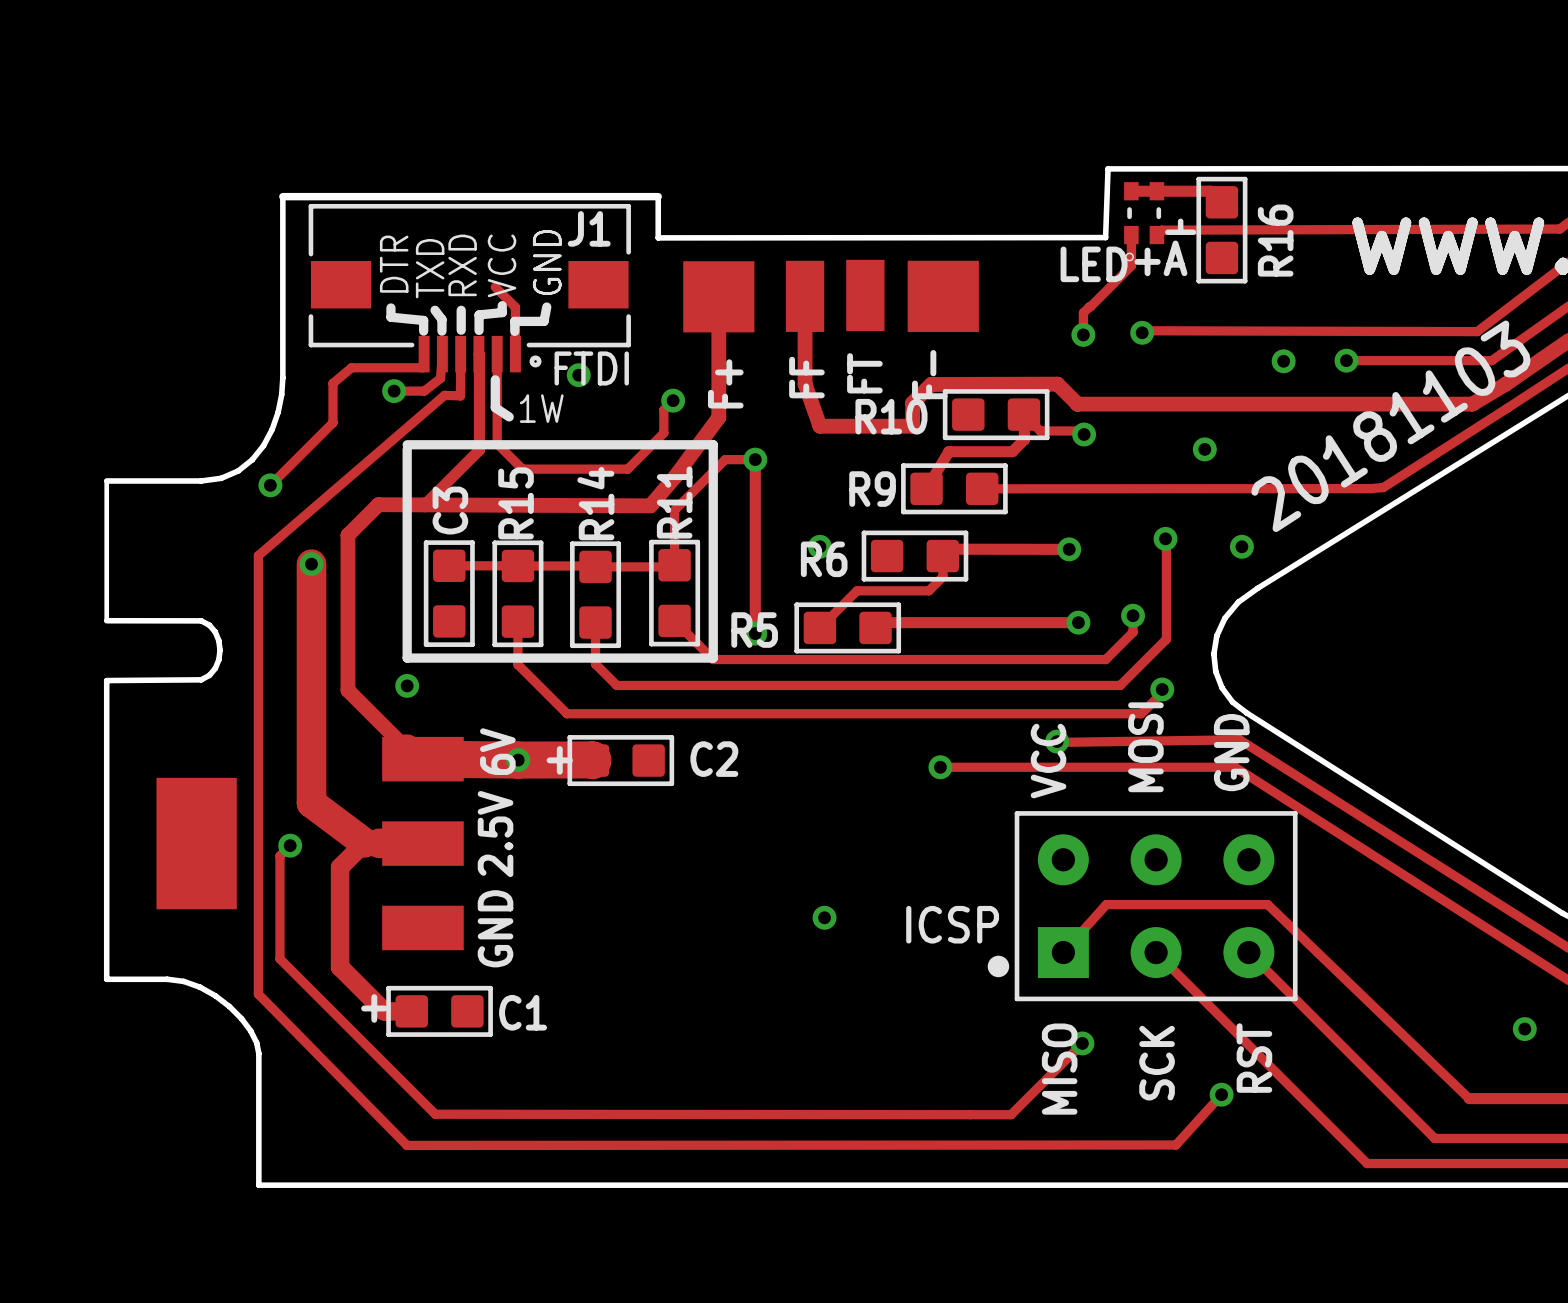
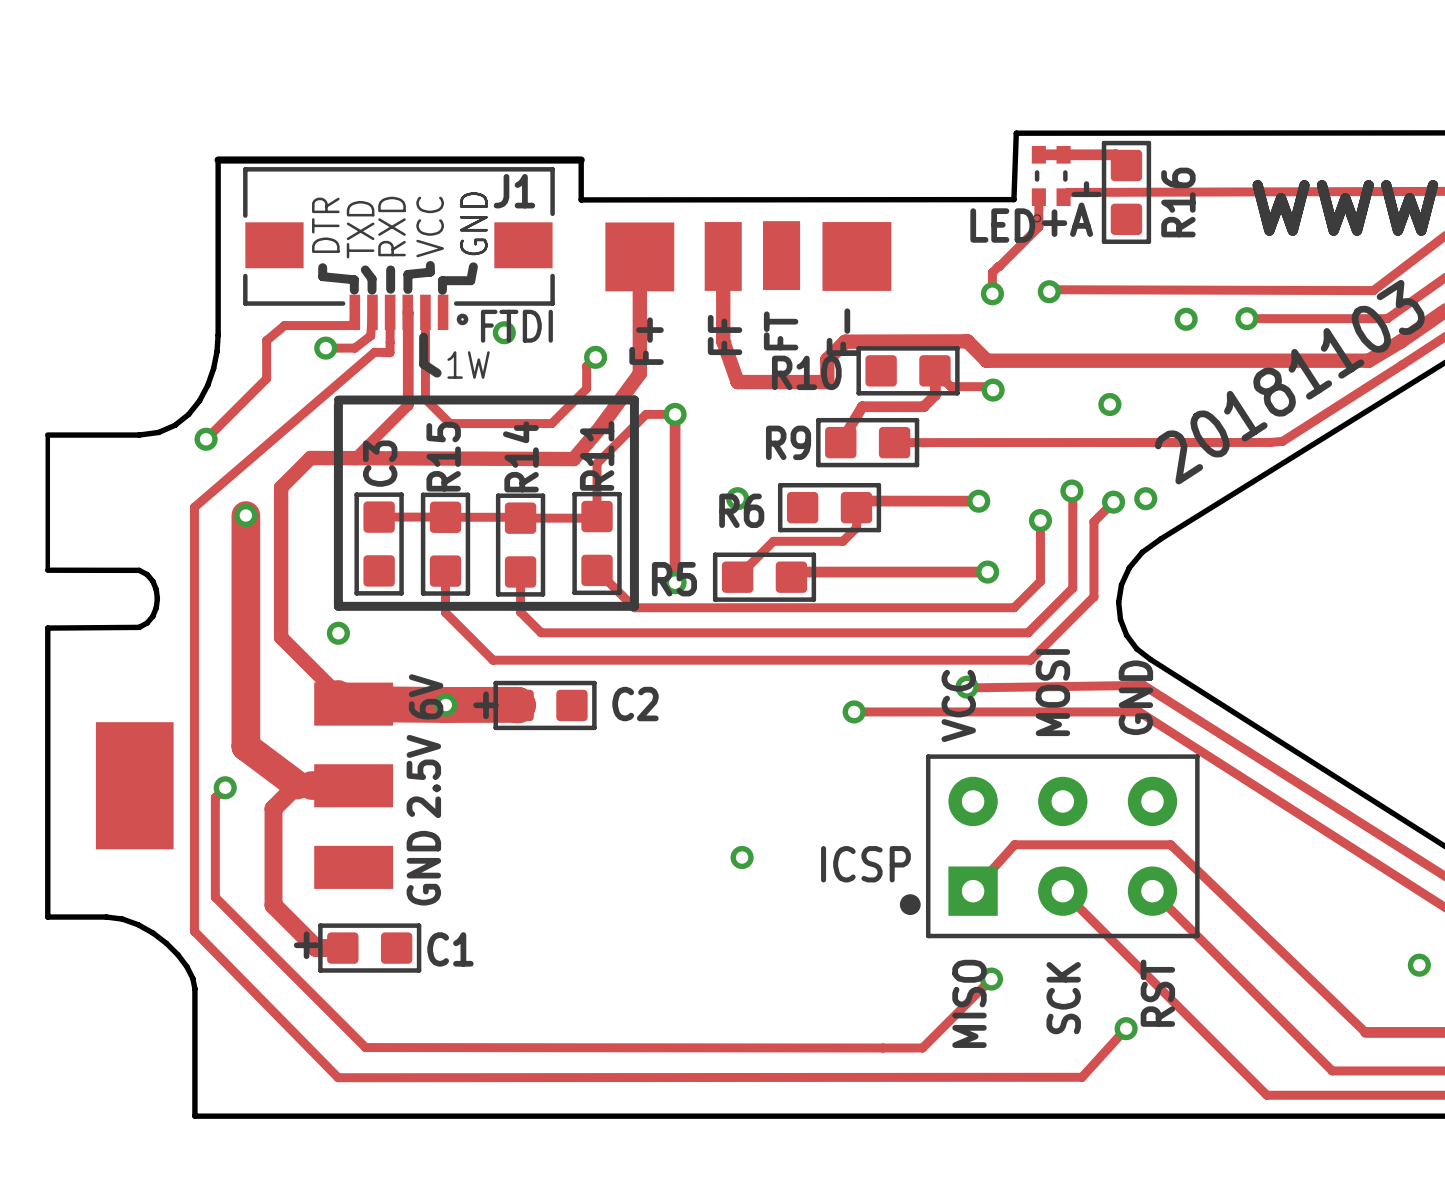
track: (495, 287) (515, 307) (515, 354) -> none
via: none -> (1113, 502)
track: none -> (1040, 520) (1040, 565)
via position: (1133, 615) -> (1040, 520)
track: (1162, 689) (1162, 692) (1141, 713) (1122, 713) -> (1113, 502) (1093, 521) (1093, 596) (1030, 660)
via: (1162, 689) -> none

